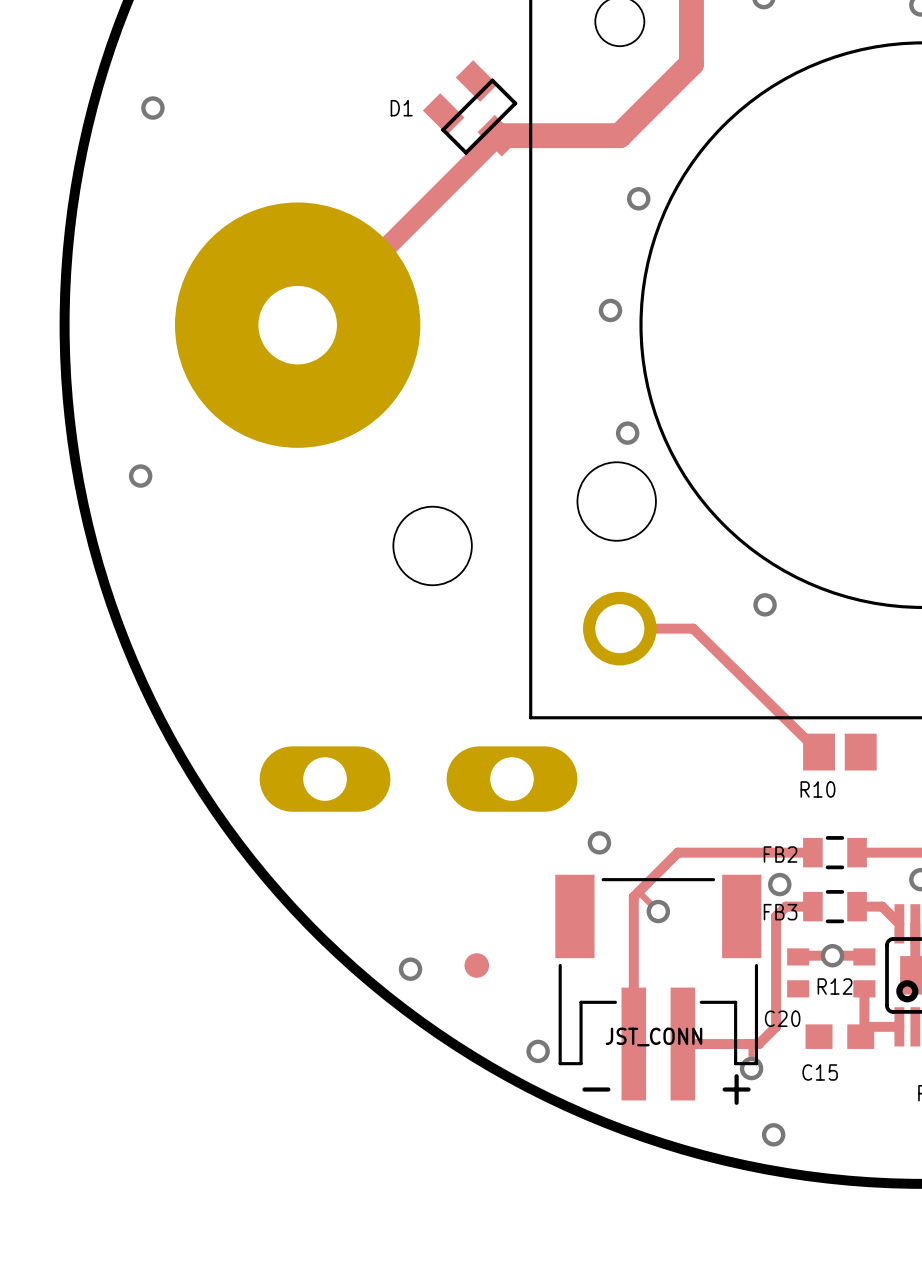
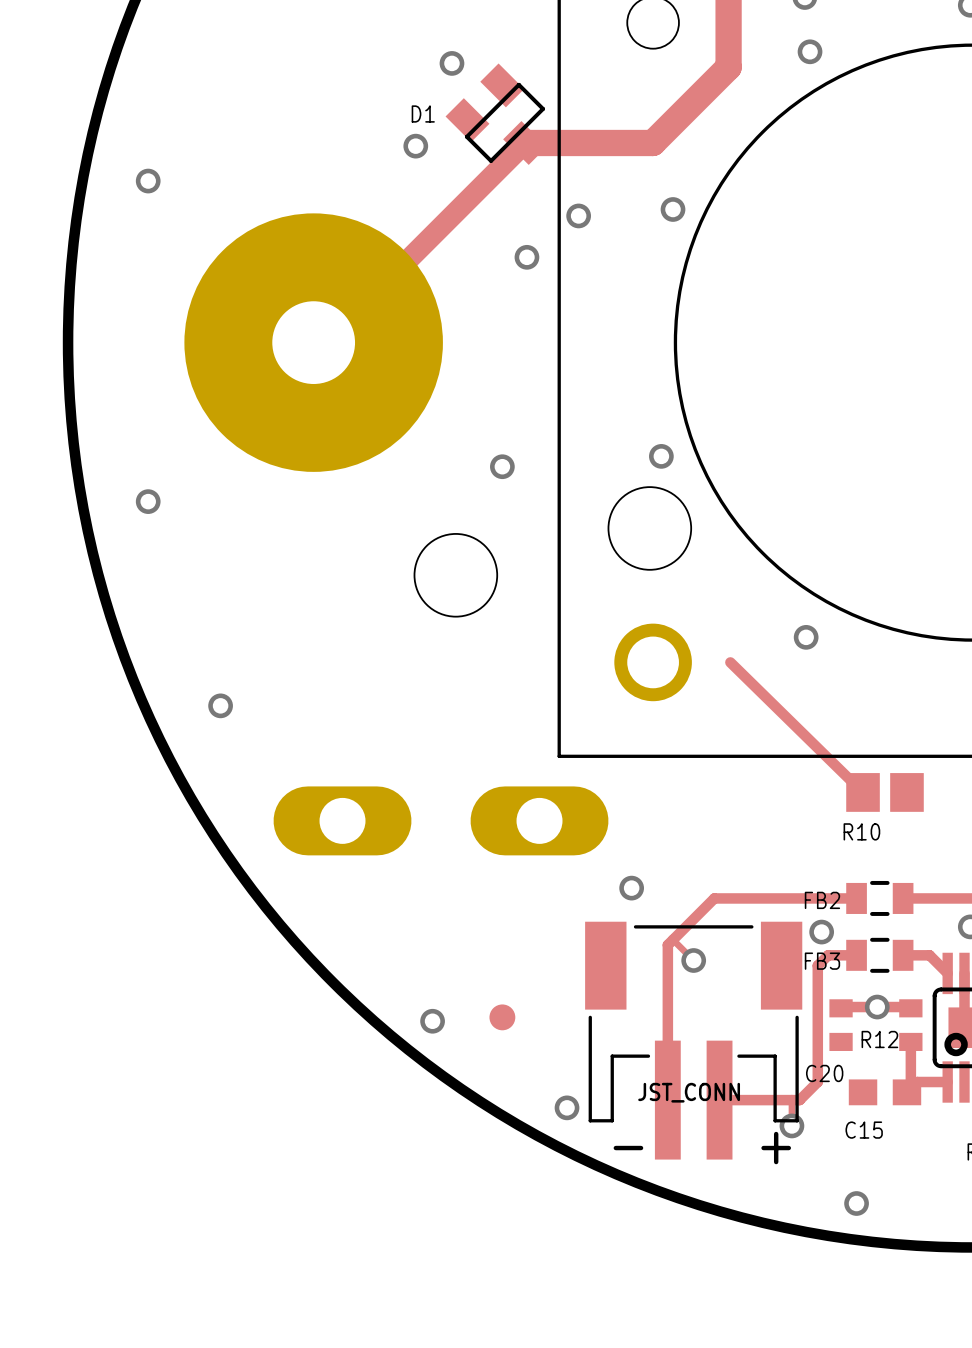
via: none -> (810, 51)
via: none -> (451, 63)
via position: (152, 108) -> (148, 181)
via: none -> (415, 146)
via: none -> (578, 215)
via: none -> (526, 257)
via: (610, 310) -> none
via: none -> (502, 466)
track: (619, 628) (693, 628) -> none
via: none -> (220, 705)
via position: (773, 1134) -> (856, 1203)

